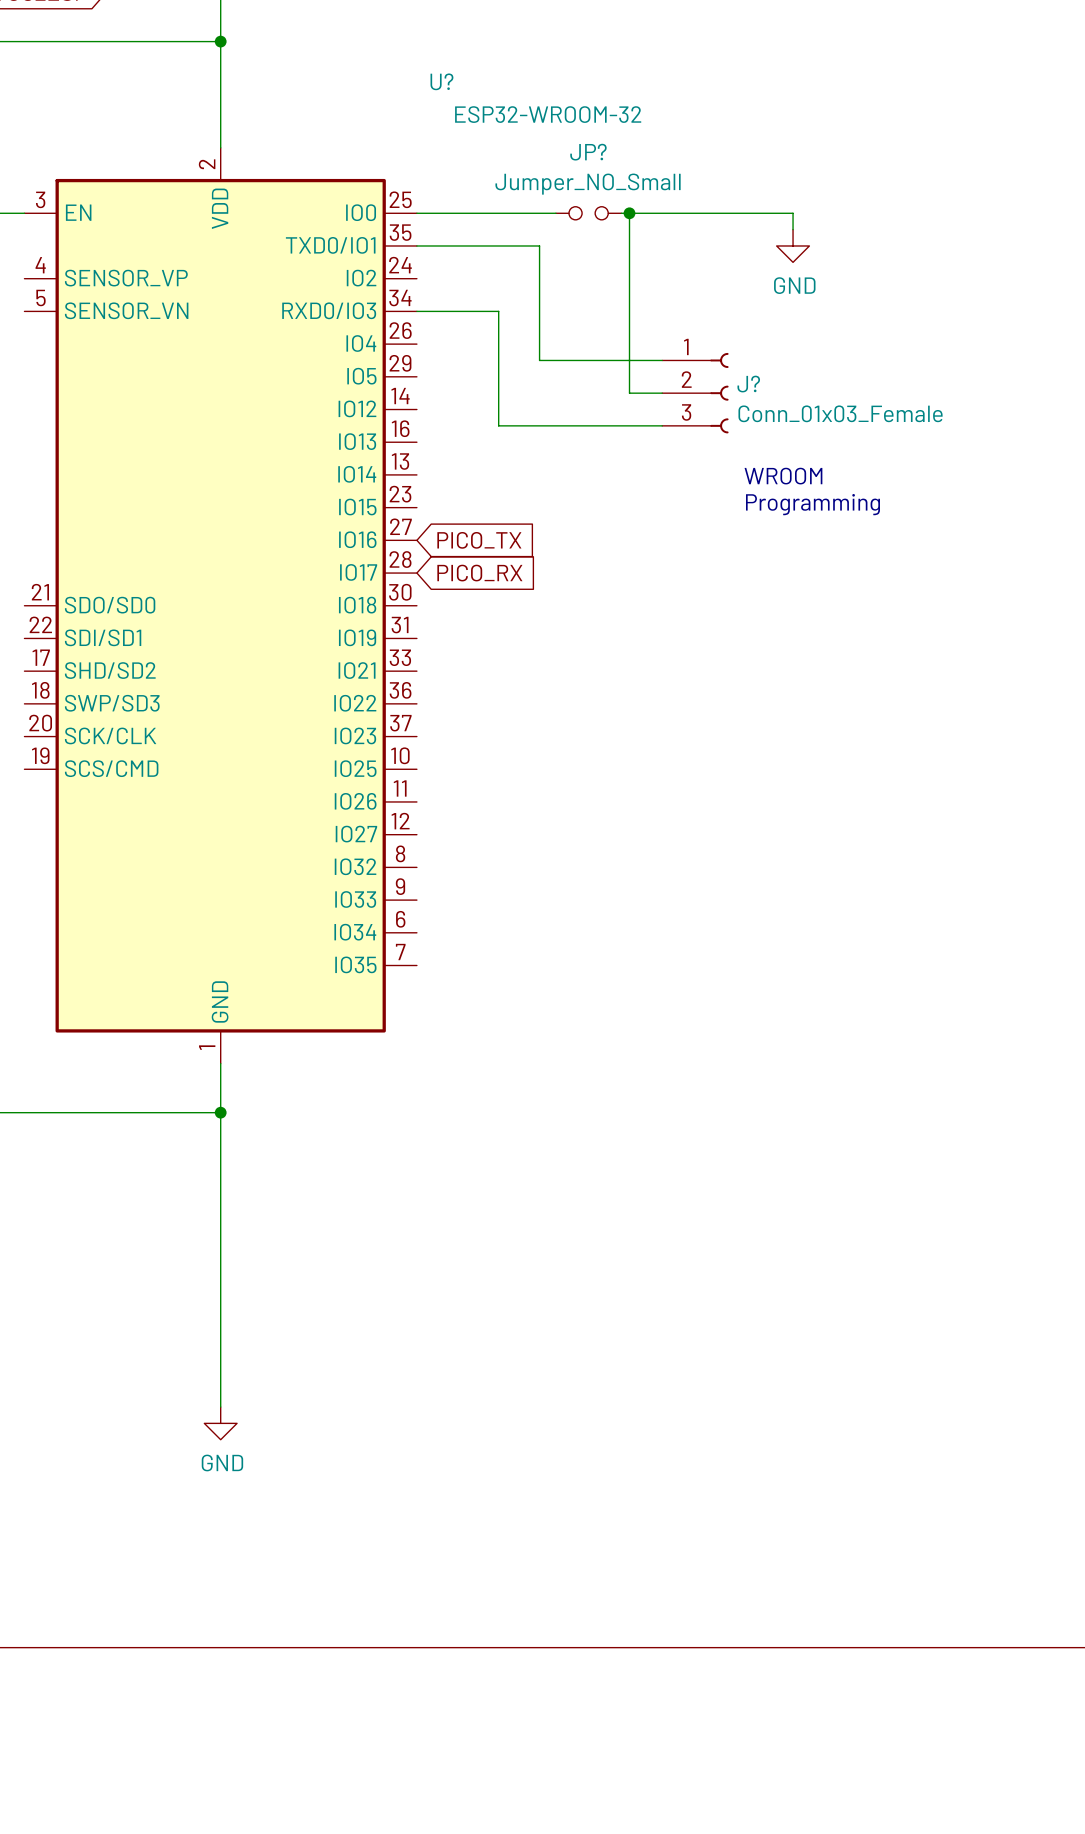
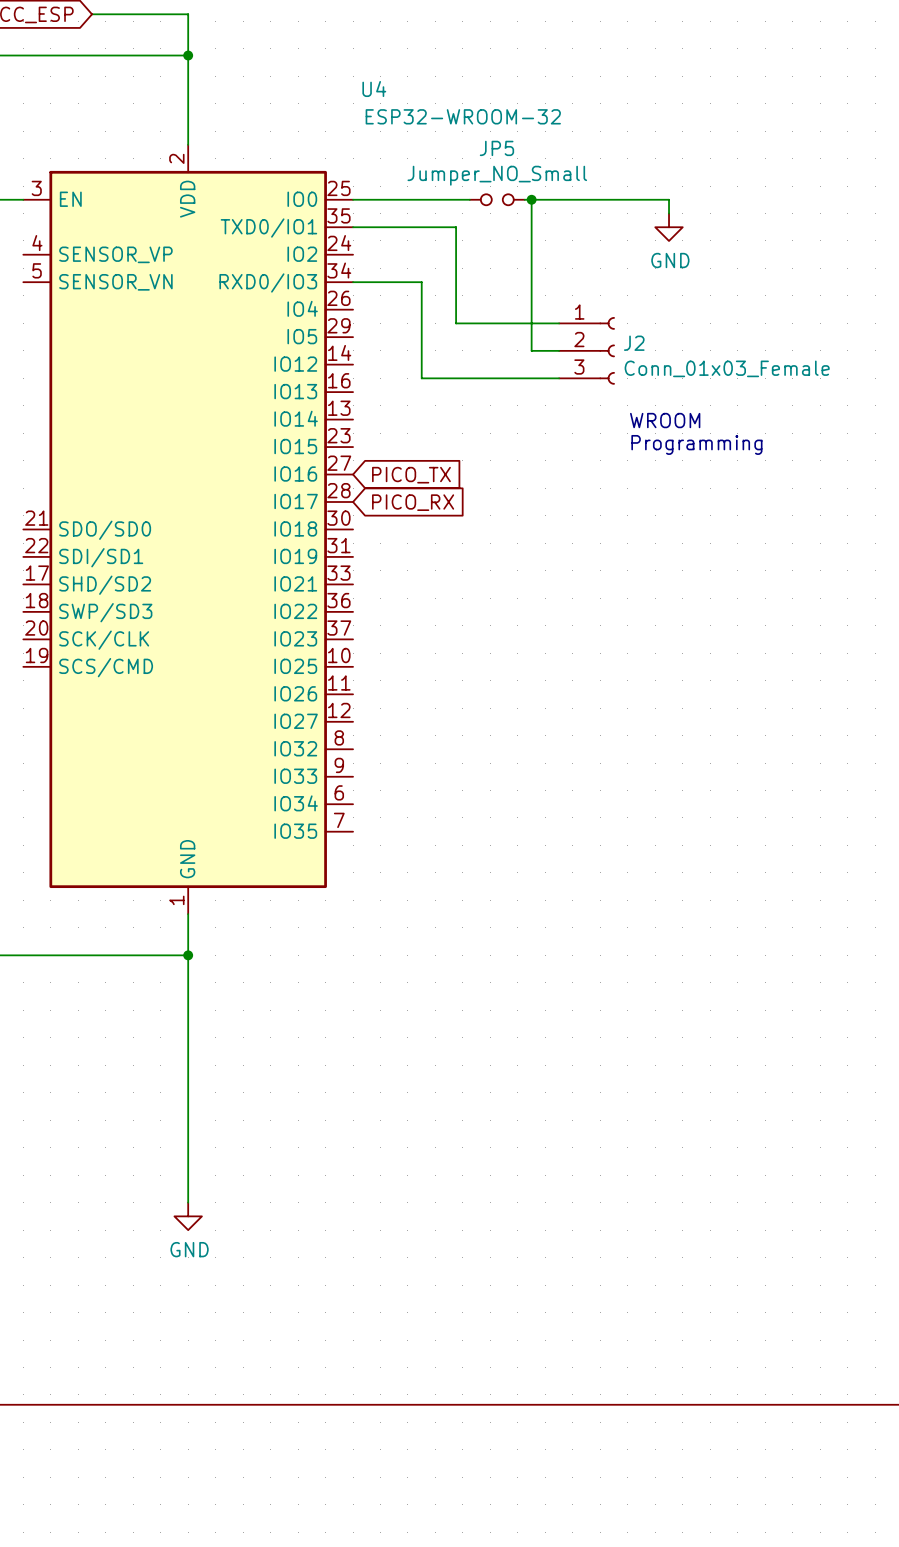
U? name: U? (441, 81) -> U4 (374, 89)
JP? name: JP? (588, 152) -> JP5 (496, 148)
J? name: J? (748, 384) -> J2 (634, 343)

